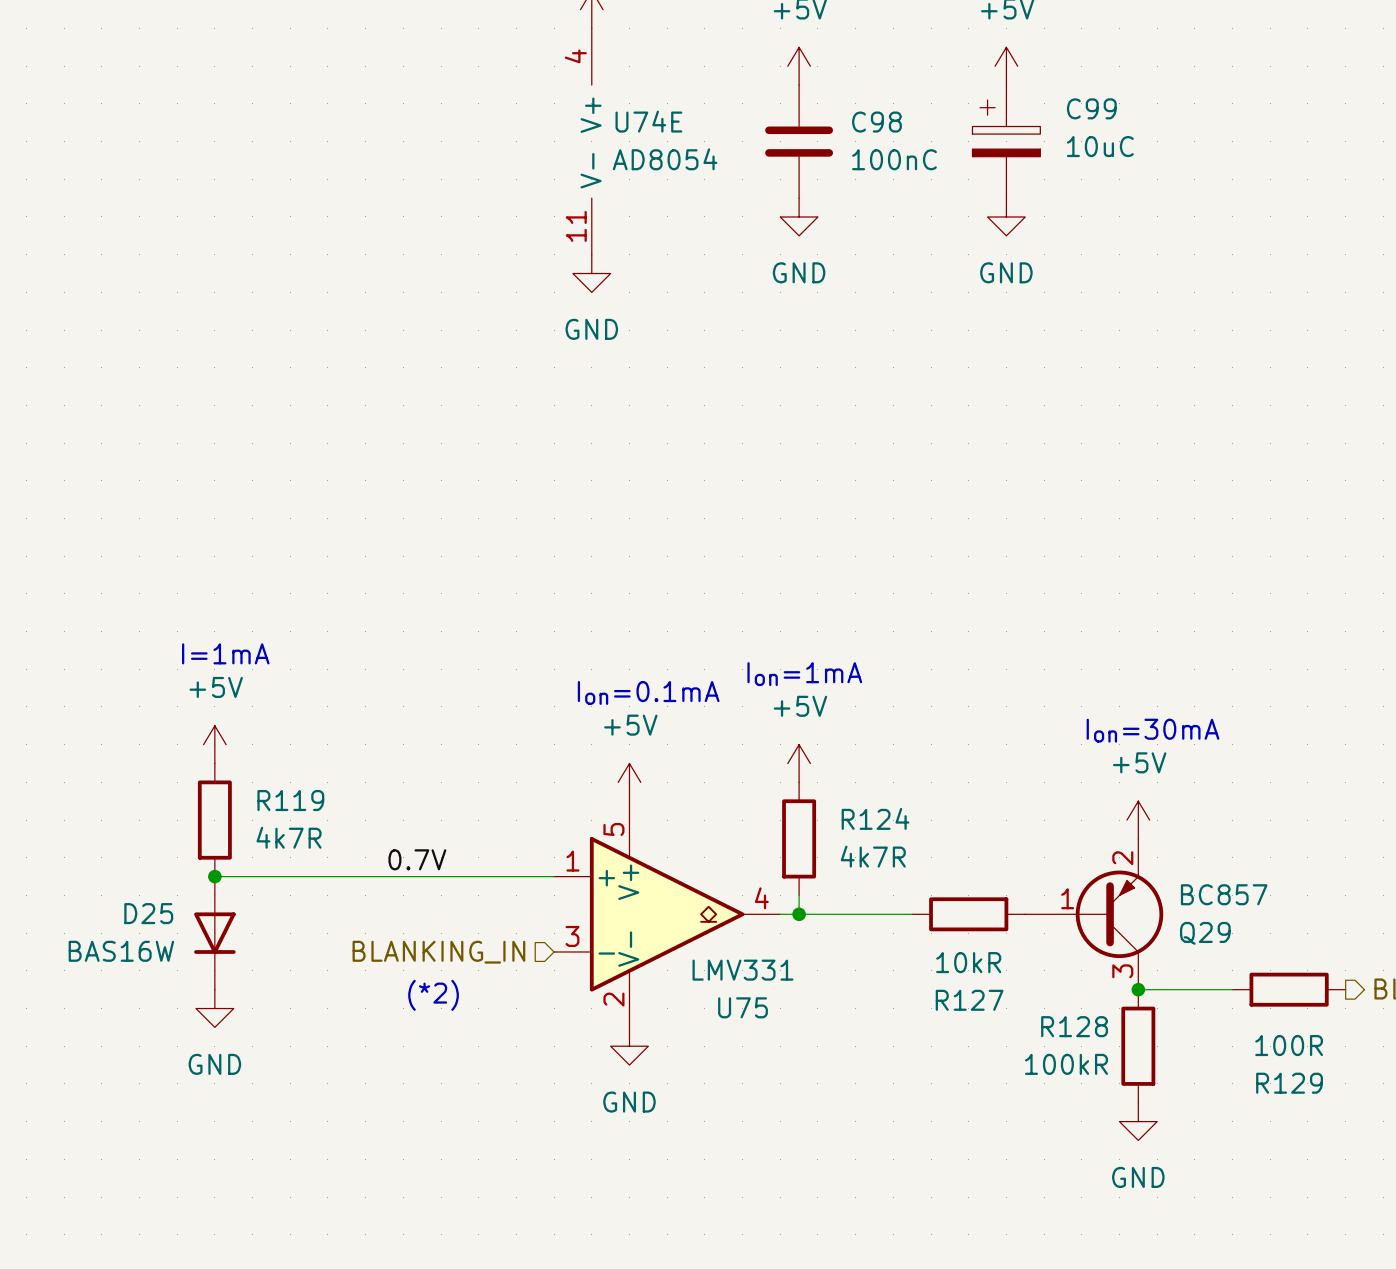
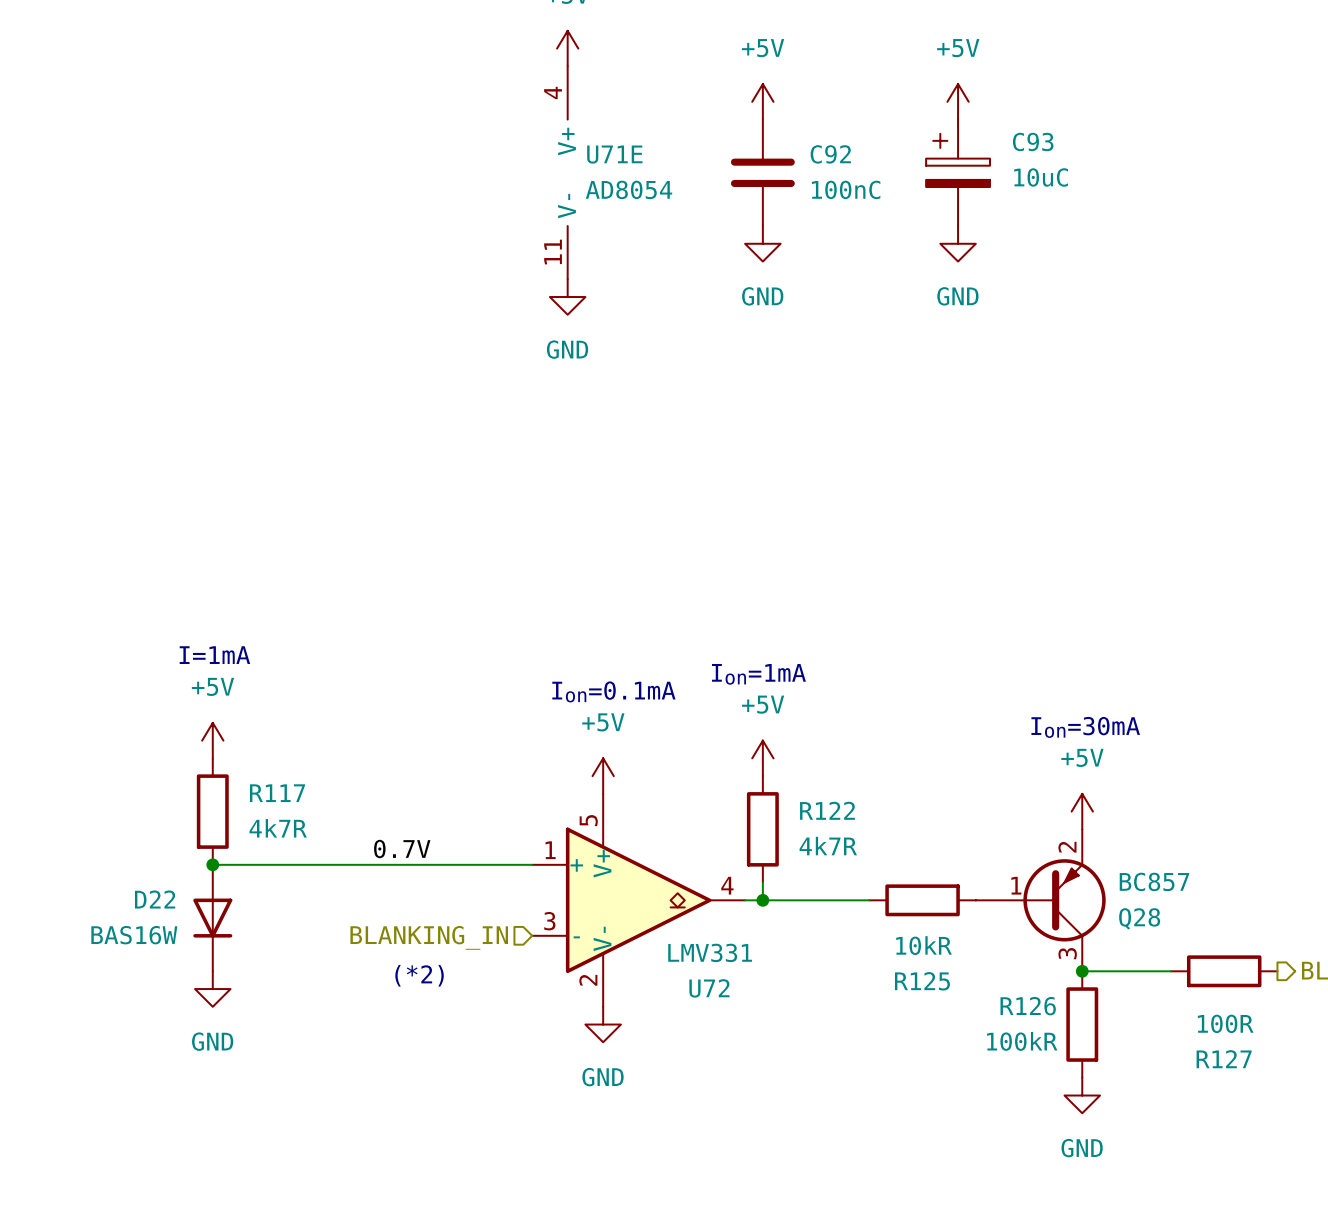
C99 name: C99 (1091, 108) -> C93 (1033, 141)
U74E name: U74E (648, 121) -> U71E (614, 154)
C98 name: C98 (876, 122) -> C92 (830, 154)
R119 name: R119 (290, 800) -> R117 (277, 793)
R124 name: R124 (875, 818) -> R122 (827, 810)
D25 name: D25 (148, 913) -> D22 (155, 899)
Q29 name: Q29 (1205, 933) -> Q28 (1139, 918)
R127 name: R127 (969, 1000) -> R125 (922, 981)
U75 name: U75 (743, 1007) -> U72 (709, 988)
R128 name: R128 (1074, 1026) -> R126 (1028, 1006)
R129 name: R129 (1289, 1083) -> R127 (1224, 1059)

